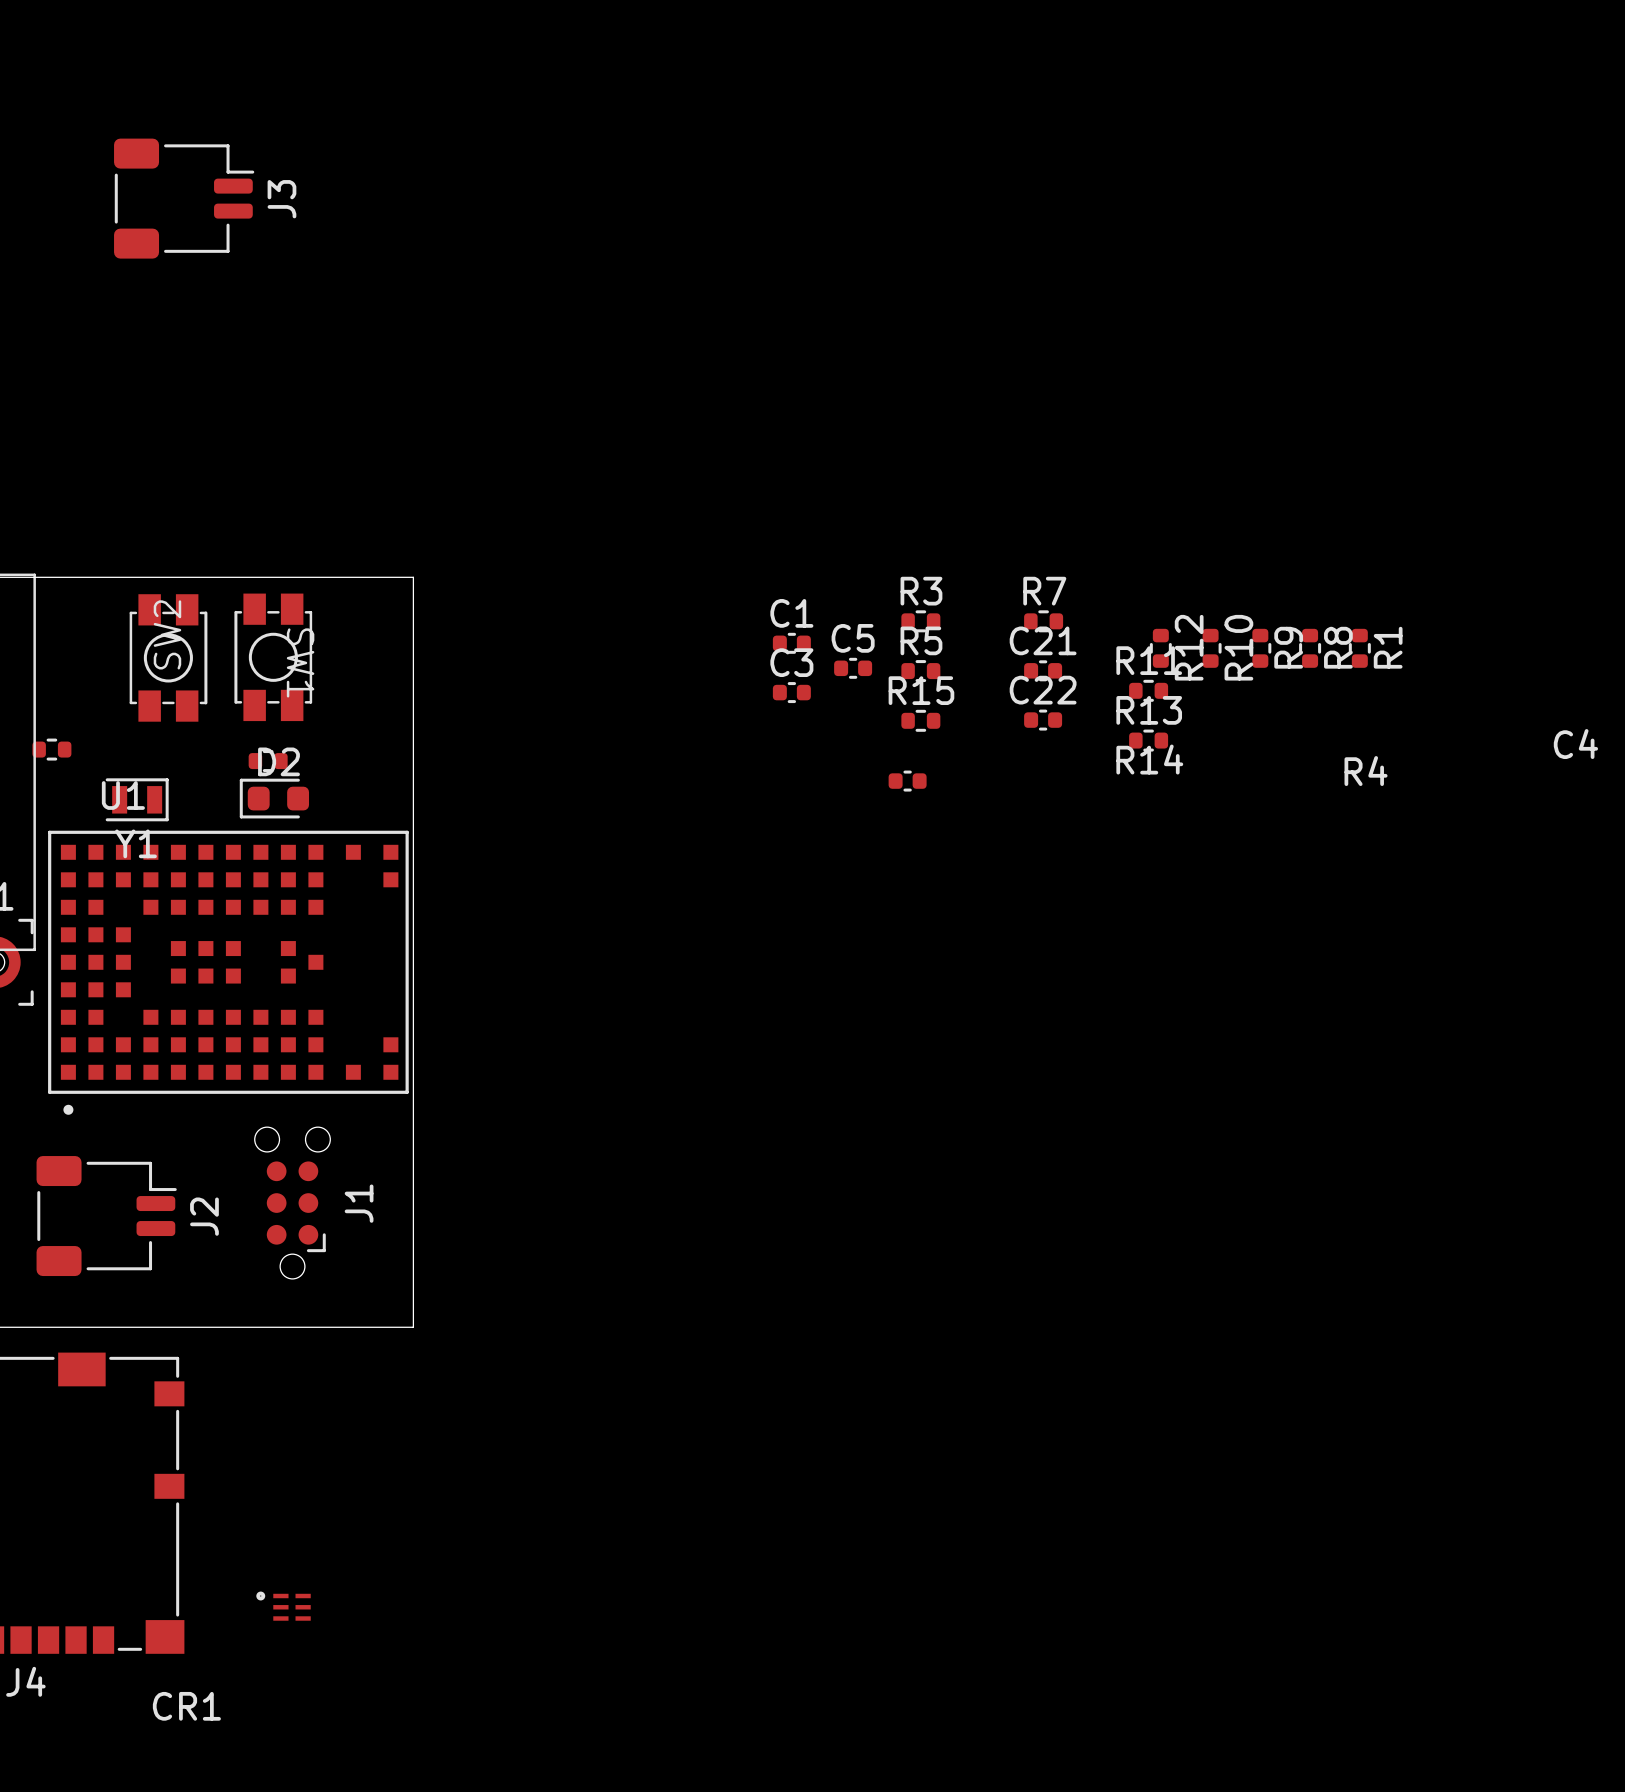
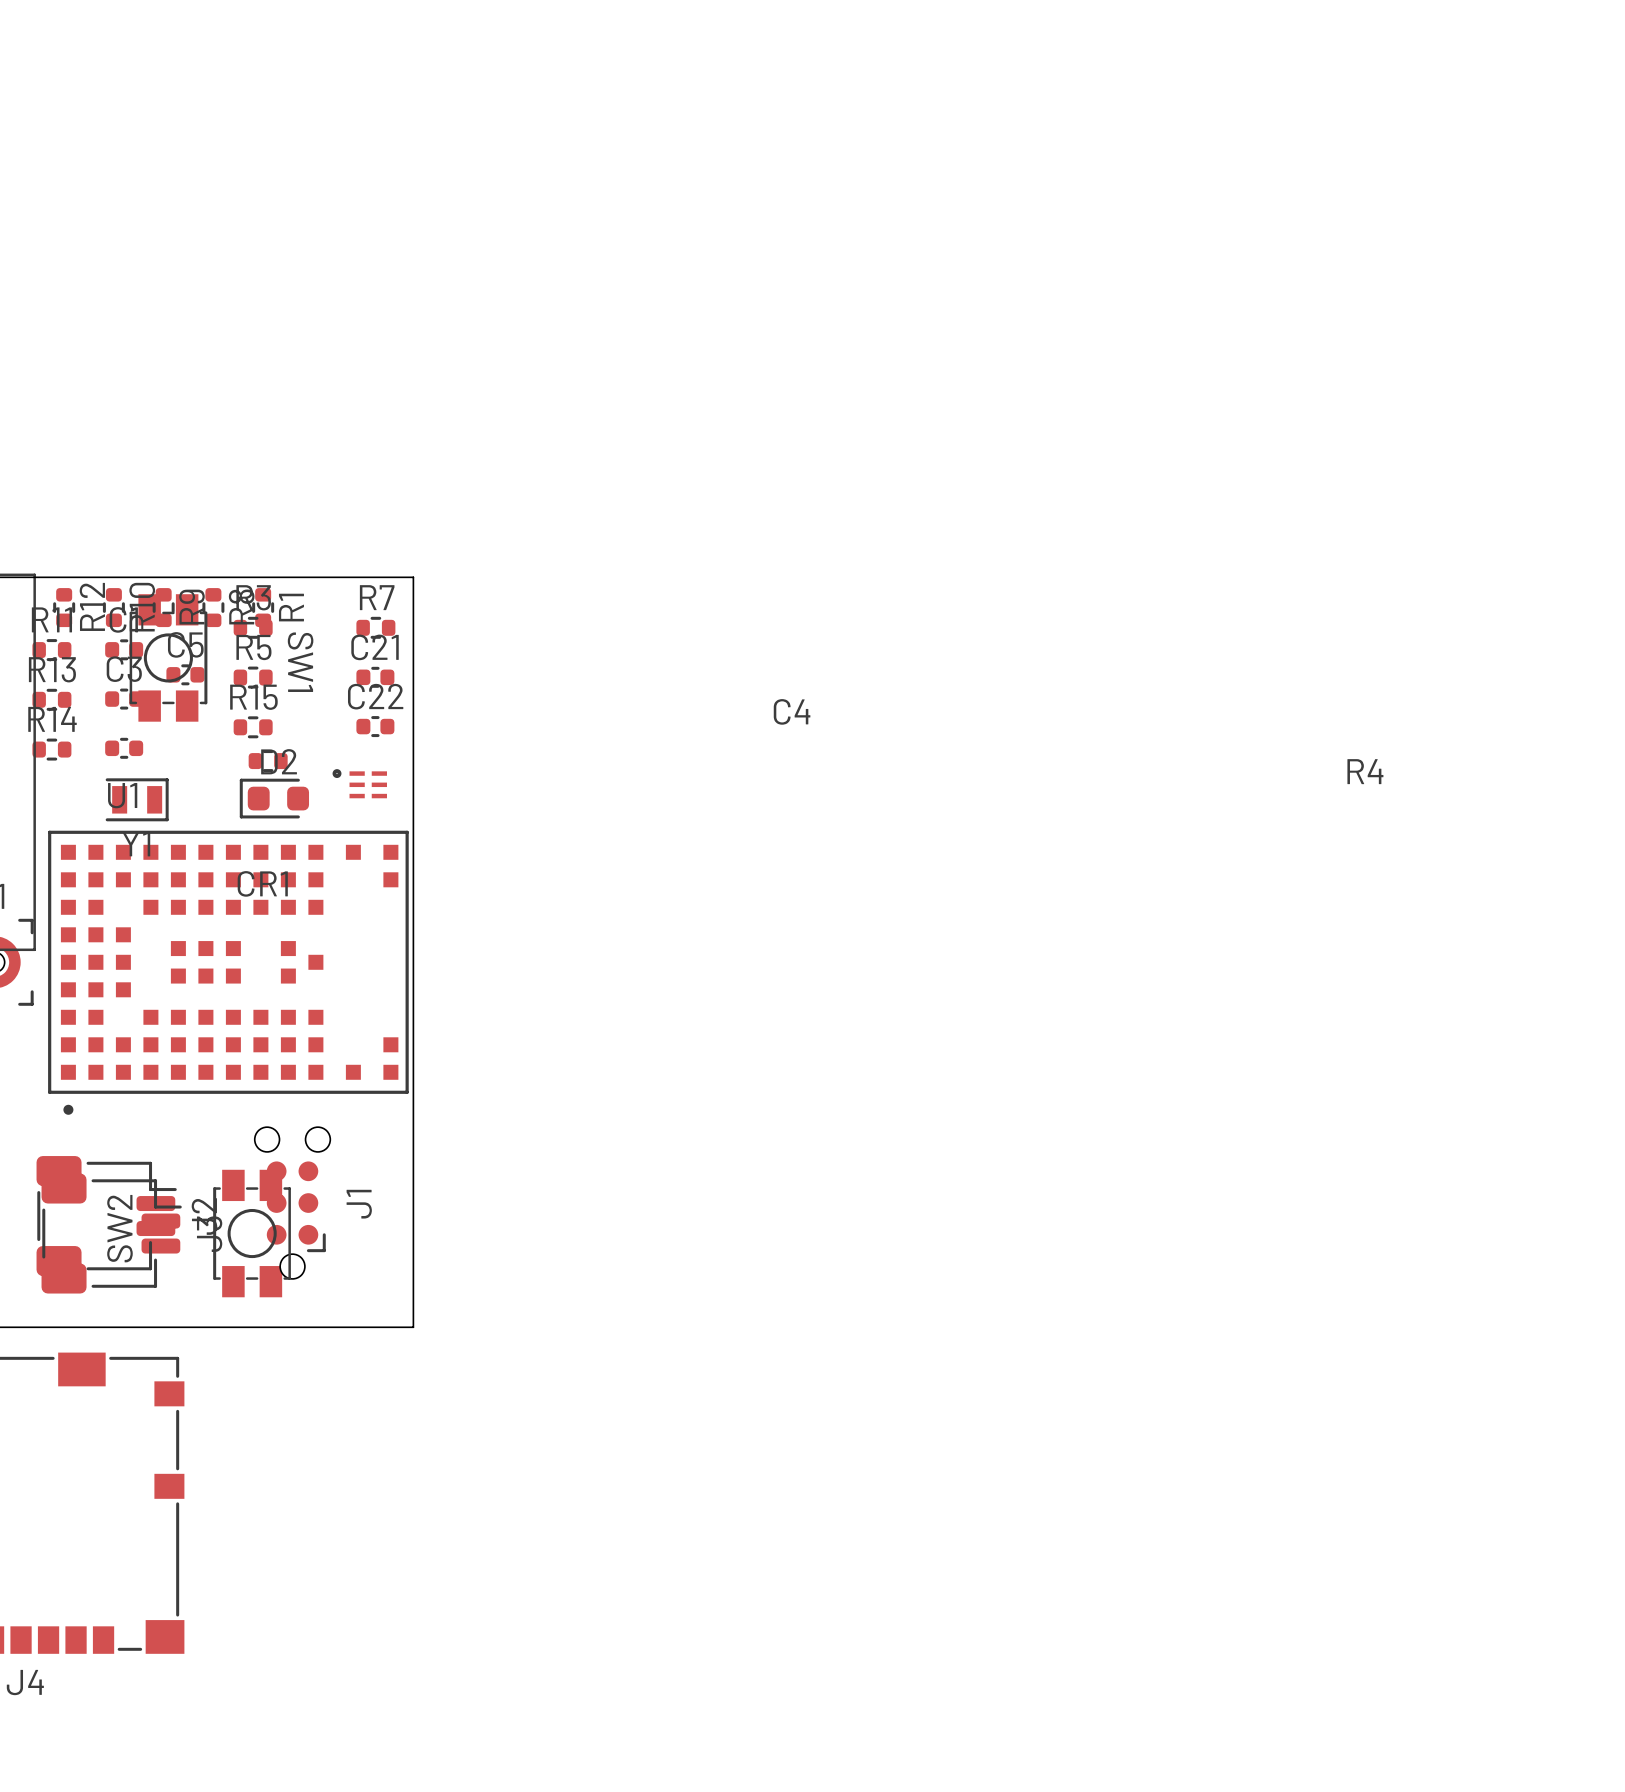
J3 position: (184, 198) -> (111, 1233)
R3 position: (920, 621) -> (253, 627)
R7 position: (1043, 621) -> (375, 627)
SW2 name position: SW2 (167, 634) -> SW2 (119, 1228)
C1 position: (791, 643) -> (124, 649)
R12 position: (1160, 648) -> (64, 607)
R10 position: (1210, 648) -> (113, 607)
R9 position: (1260, 648) -> (163, 607)
R8 position: (1310, 648) -> (213, 607)
R1 position: (1359, 648) -> (263, 607)
SW2 position: (273, 657) -> (252, 1233)
C5 position: (853, 668) -> (185, 674)
C21 position: (1043, 670) -> (375, 677)
R5: (920, 671) -> none
R5: none -> (253, 677)
R11 position: (1148, 690) -> (51, 650)
C3 position: (791, 692) -> (124, 699)
R15 position: (920, 720) -> (253, 727)
C22 position: (1043, 720) -> (375, 726)
R13 position: (1148, 740) -> (51, 699)
R14 name position: R14 (1149, 759) -> R14 (52, 719)
C4 position: (907, 781) -> (124, 748)
CR1 position: (283, 1606) -> (359, 783)

